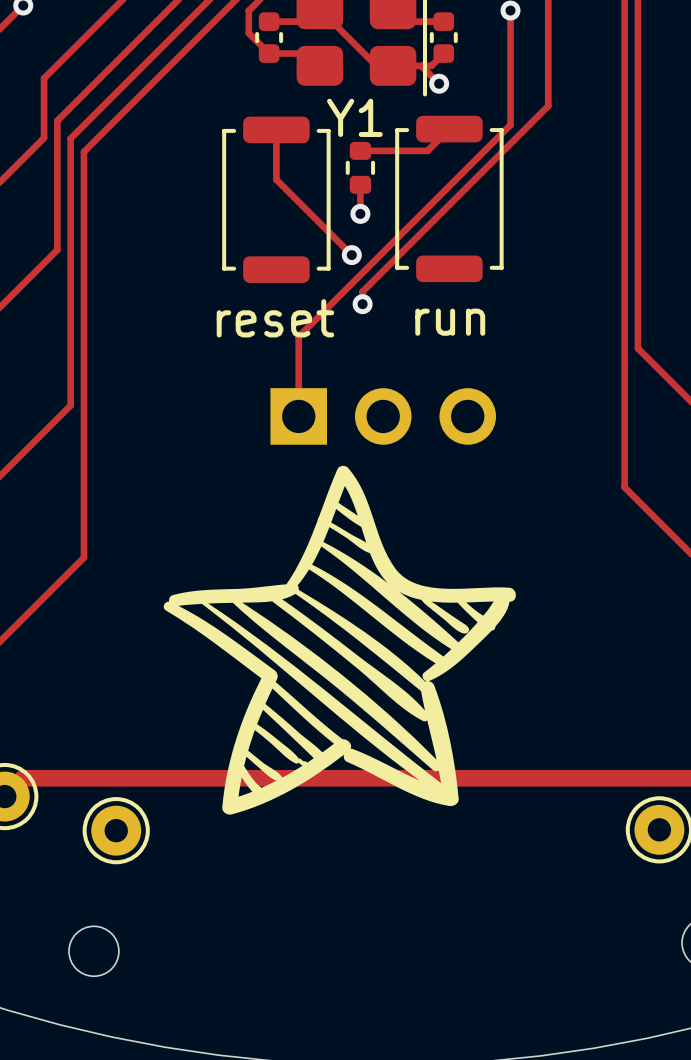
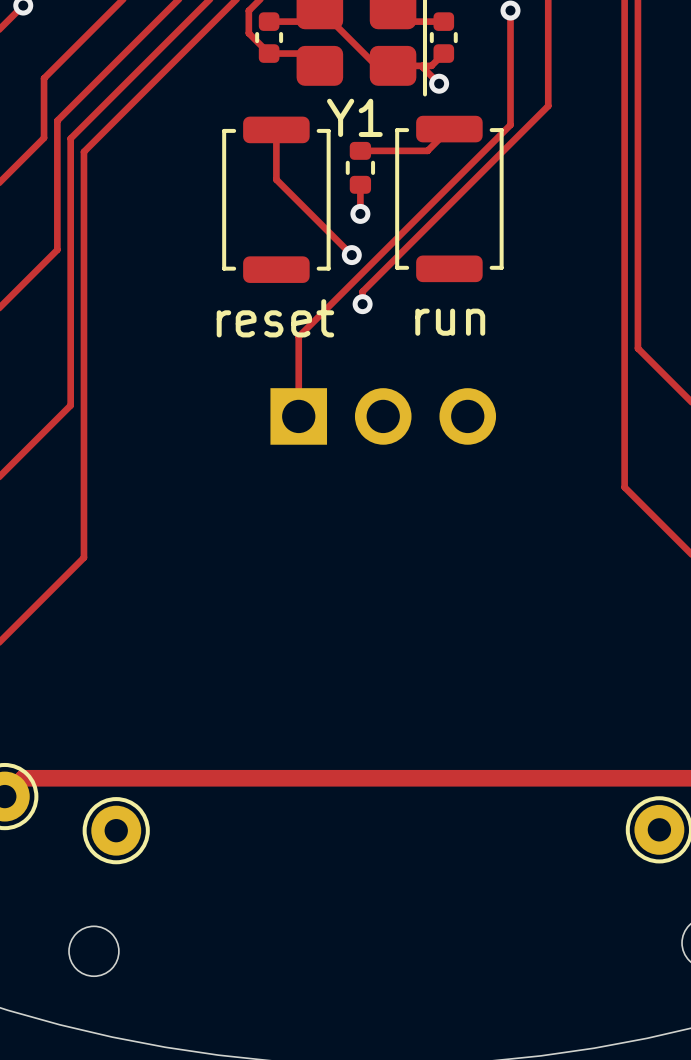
drawing: [163, 465, 516, 815] -> none

